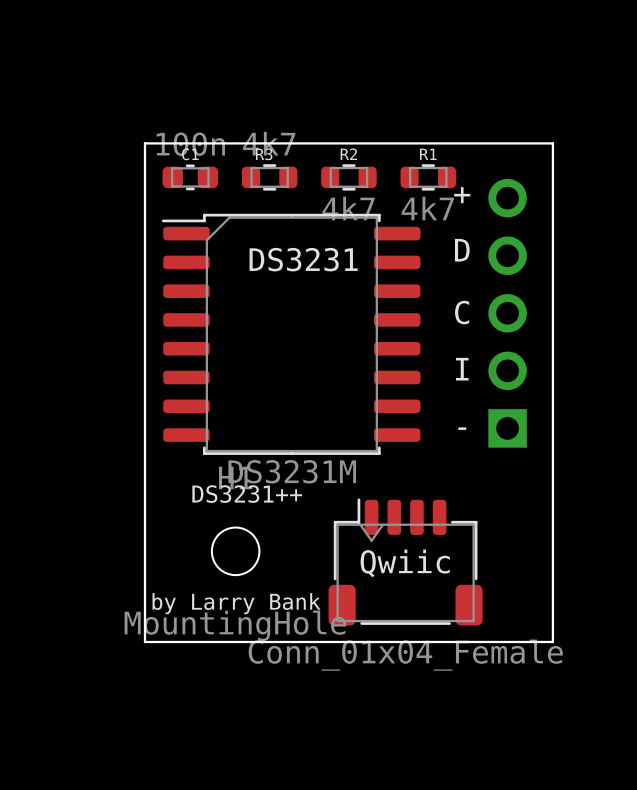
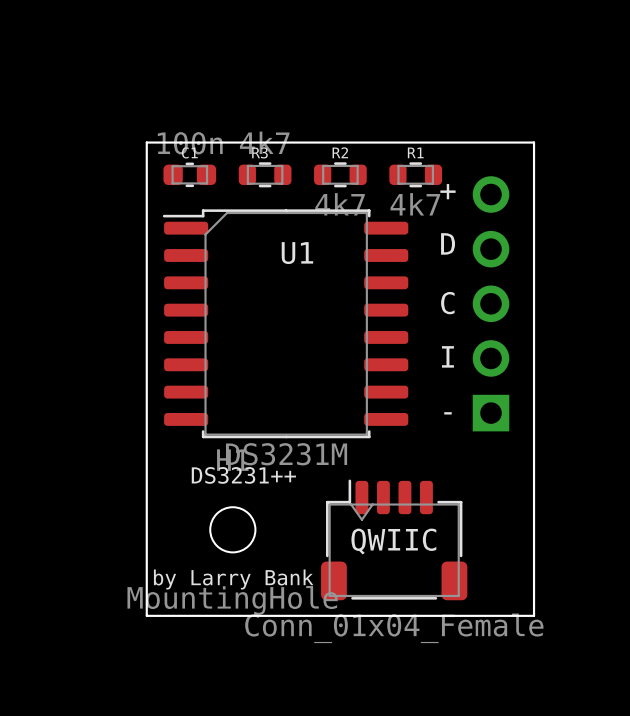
DS3231 name: DS3231 (303, 259) -> U1 (297, 253)
Qwiic name: Qwiic (405, 563) -> QWIIC (393, 541)

